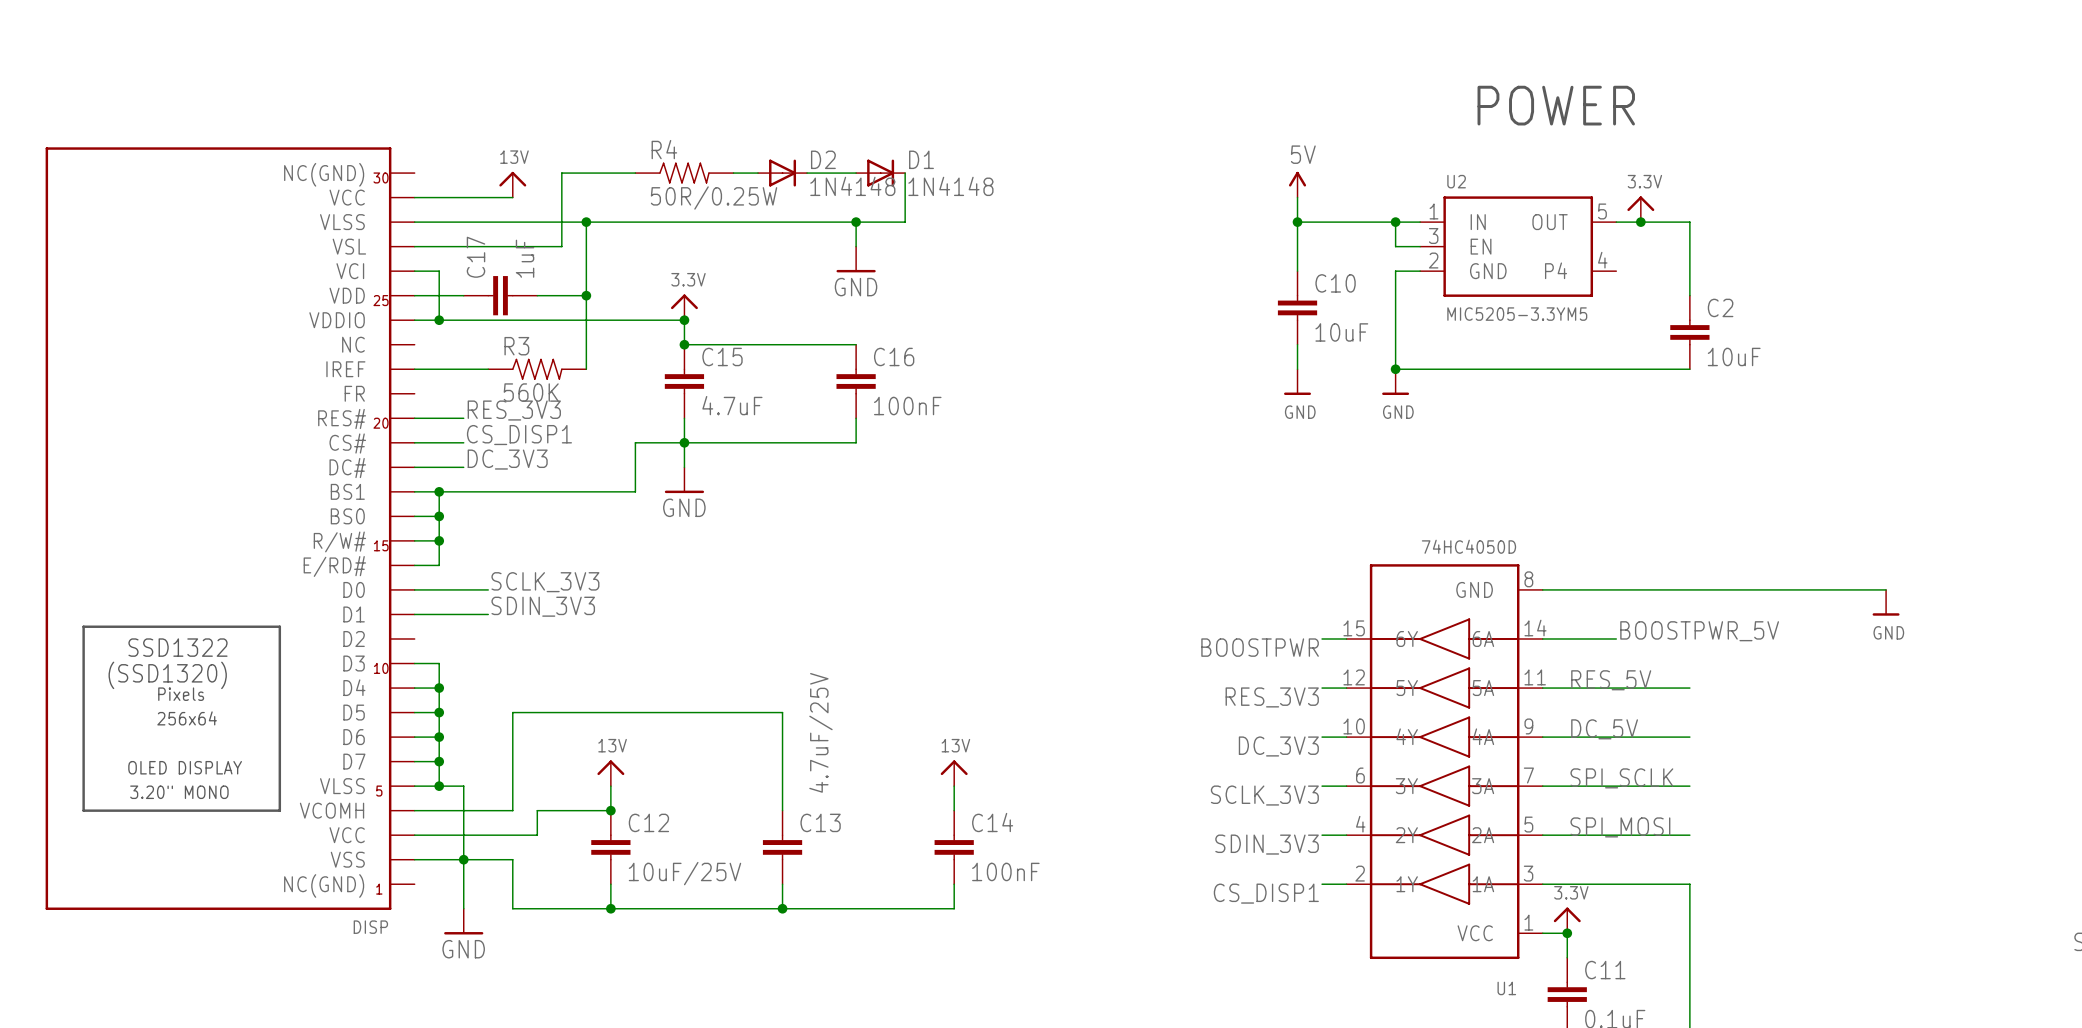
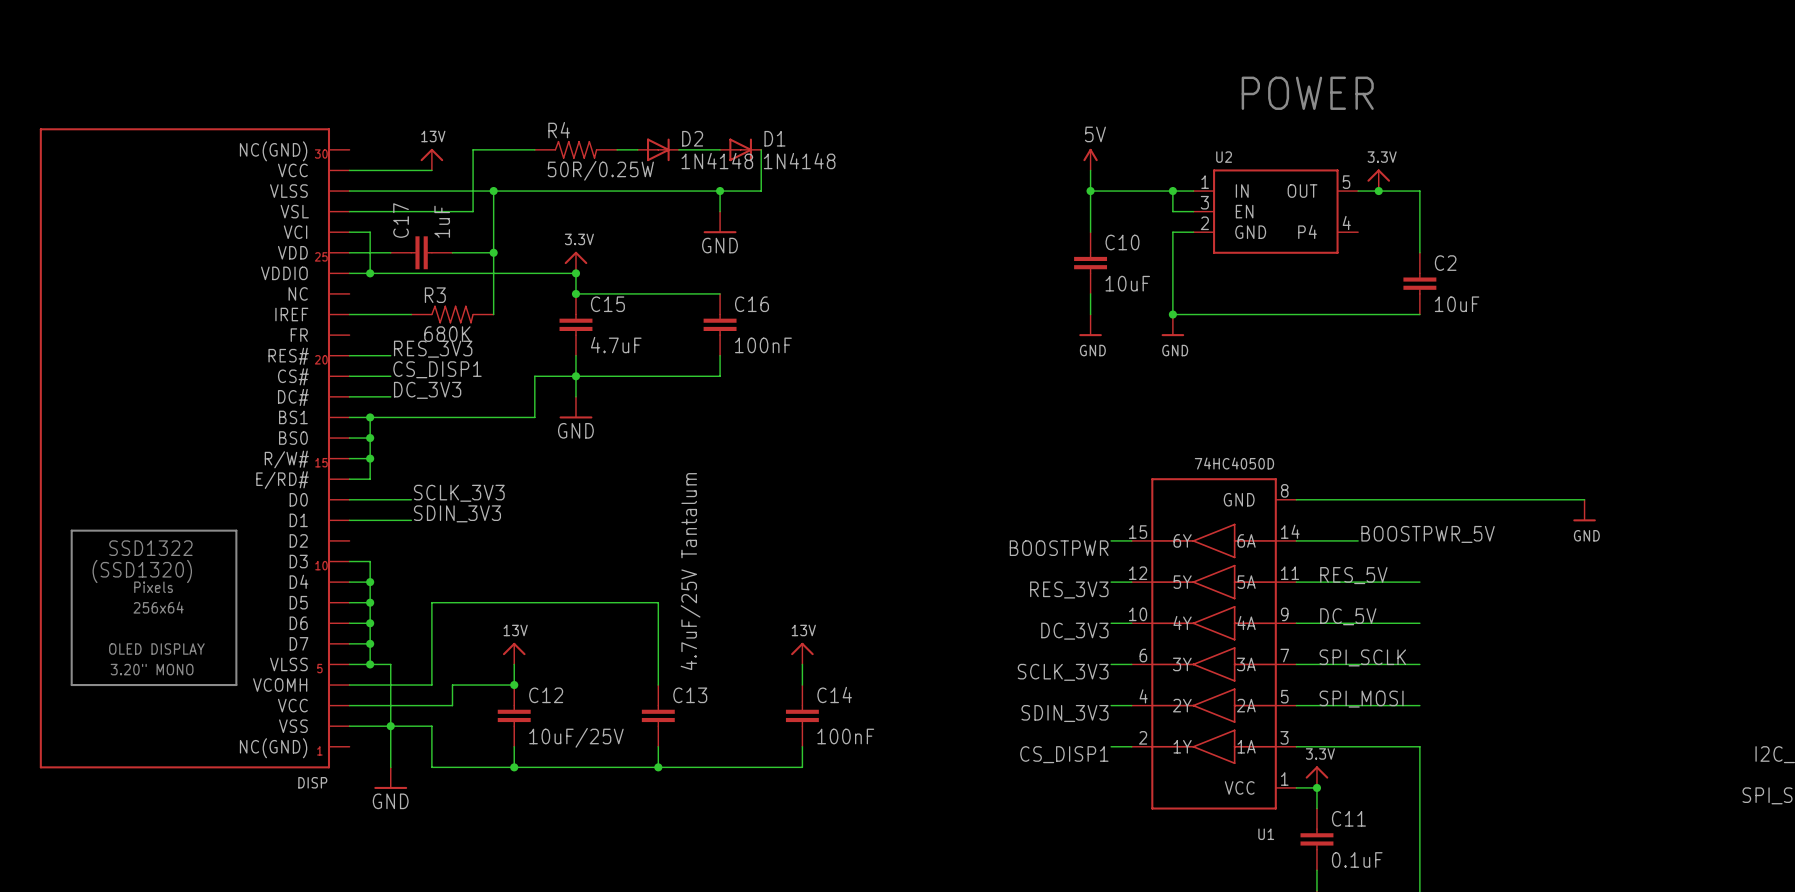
U2 value: MIC5205-3.3YM5 (1517, 314) -> none
R3 value: 560K (531, 392) -> 680K (447, 334)
C13 value: 4.7uF/25V (820, 732) -> 4.7uF/25V Tantalum (690, 571)

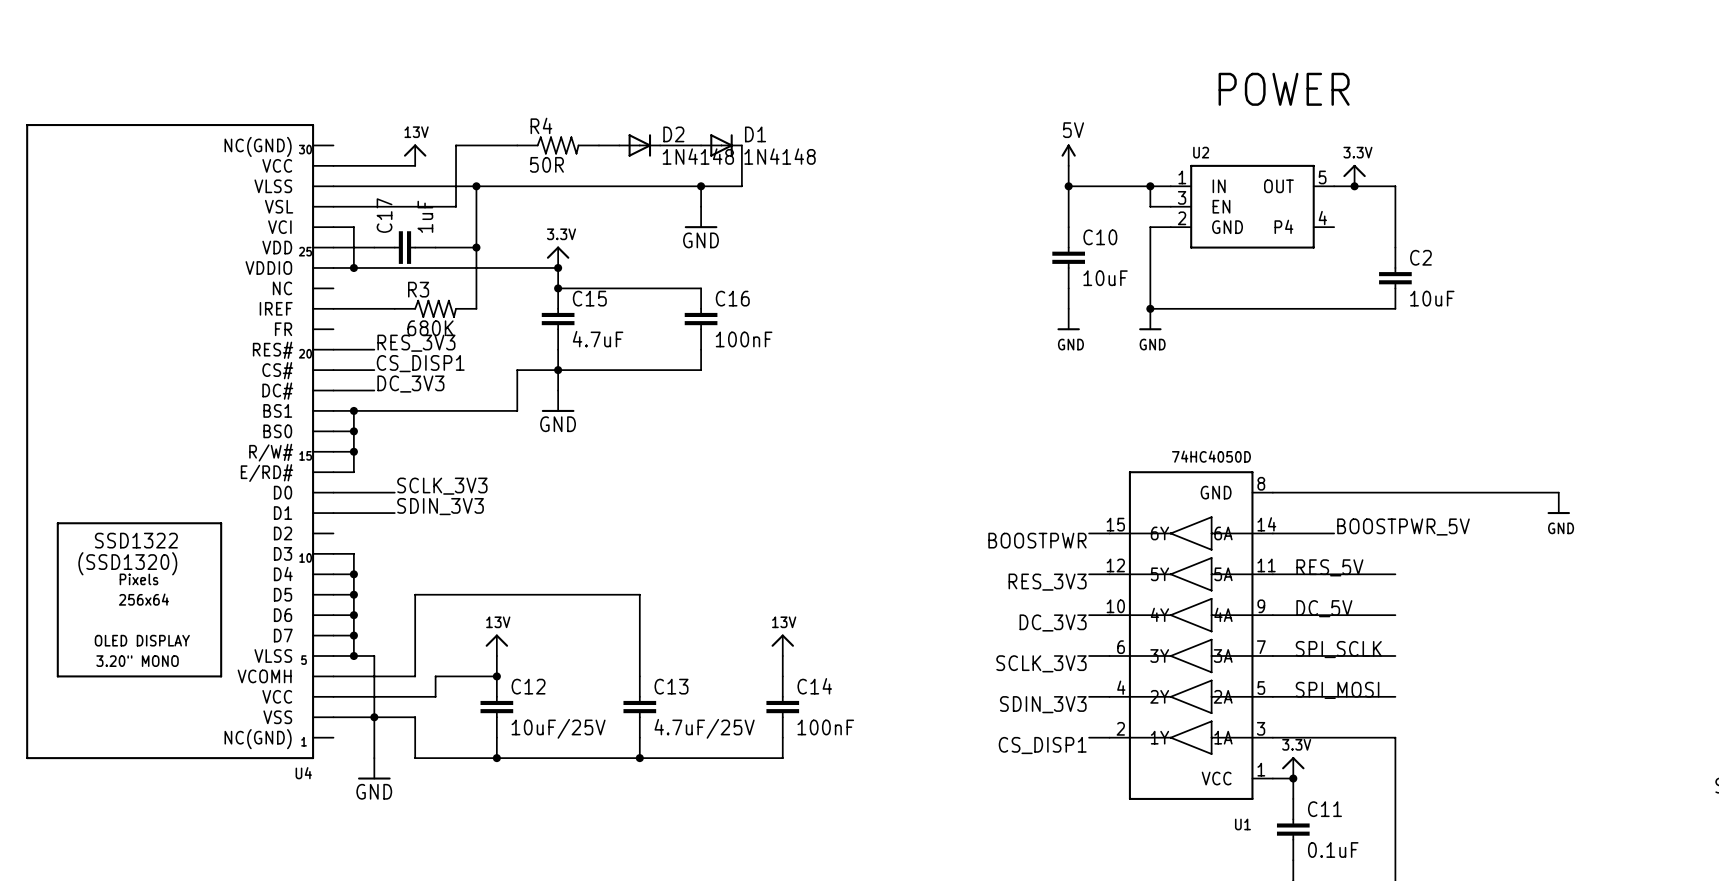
R4 value: 50R/0.25W (600, 170) -> 50R (546, 164)
C13 value: 4.7uF/25V Tantalum (690, 571) -> 4.7uF/25V (704, 728)
DISP name: DISP (312, 782) -> U4 (303, 773)

